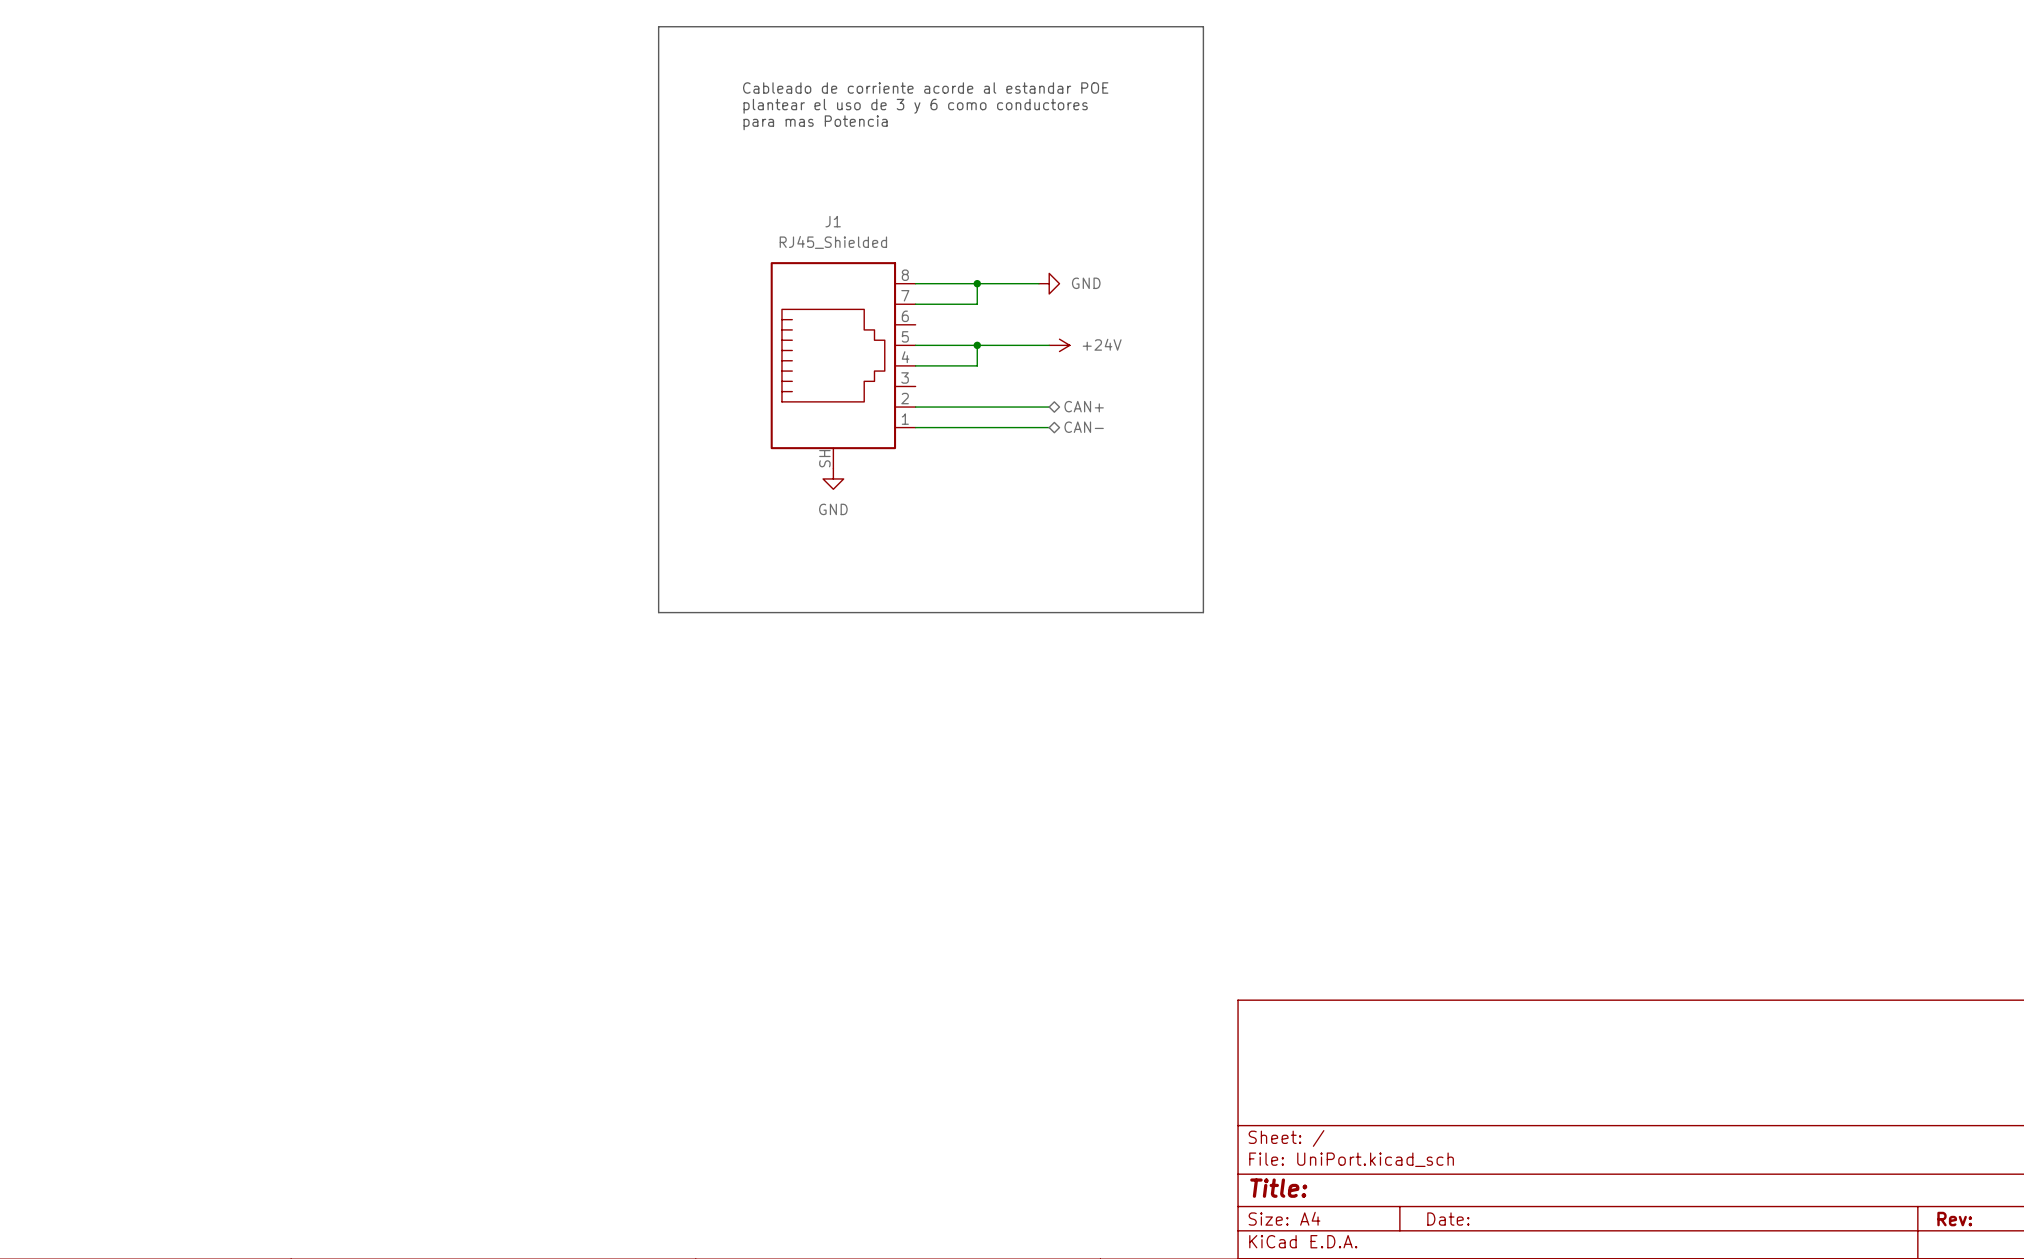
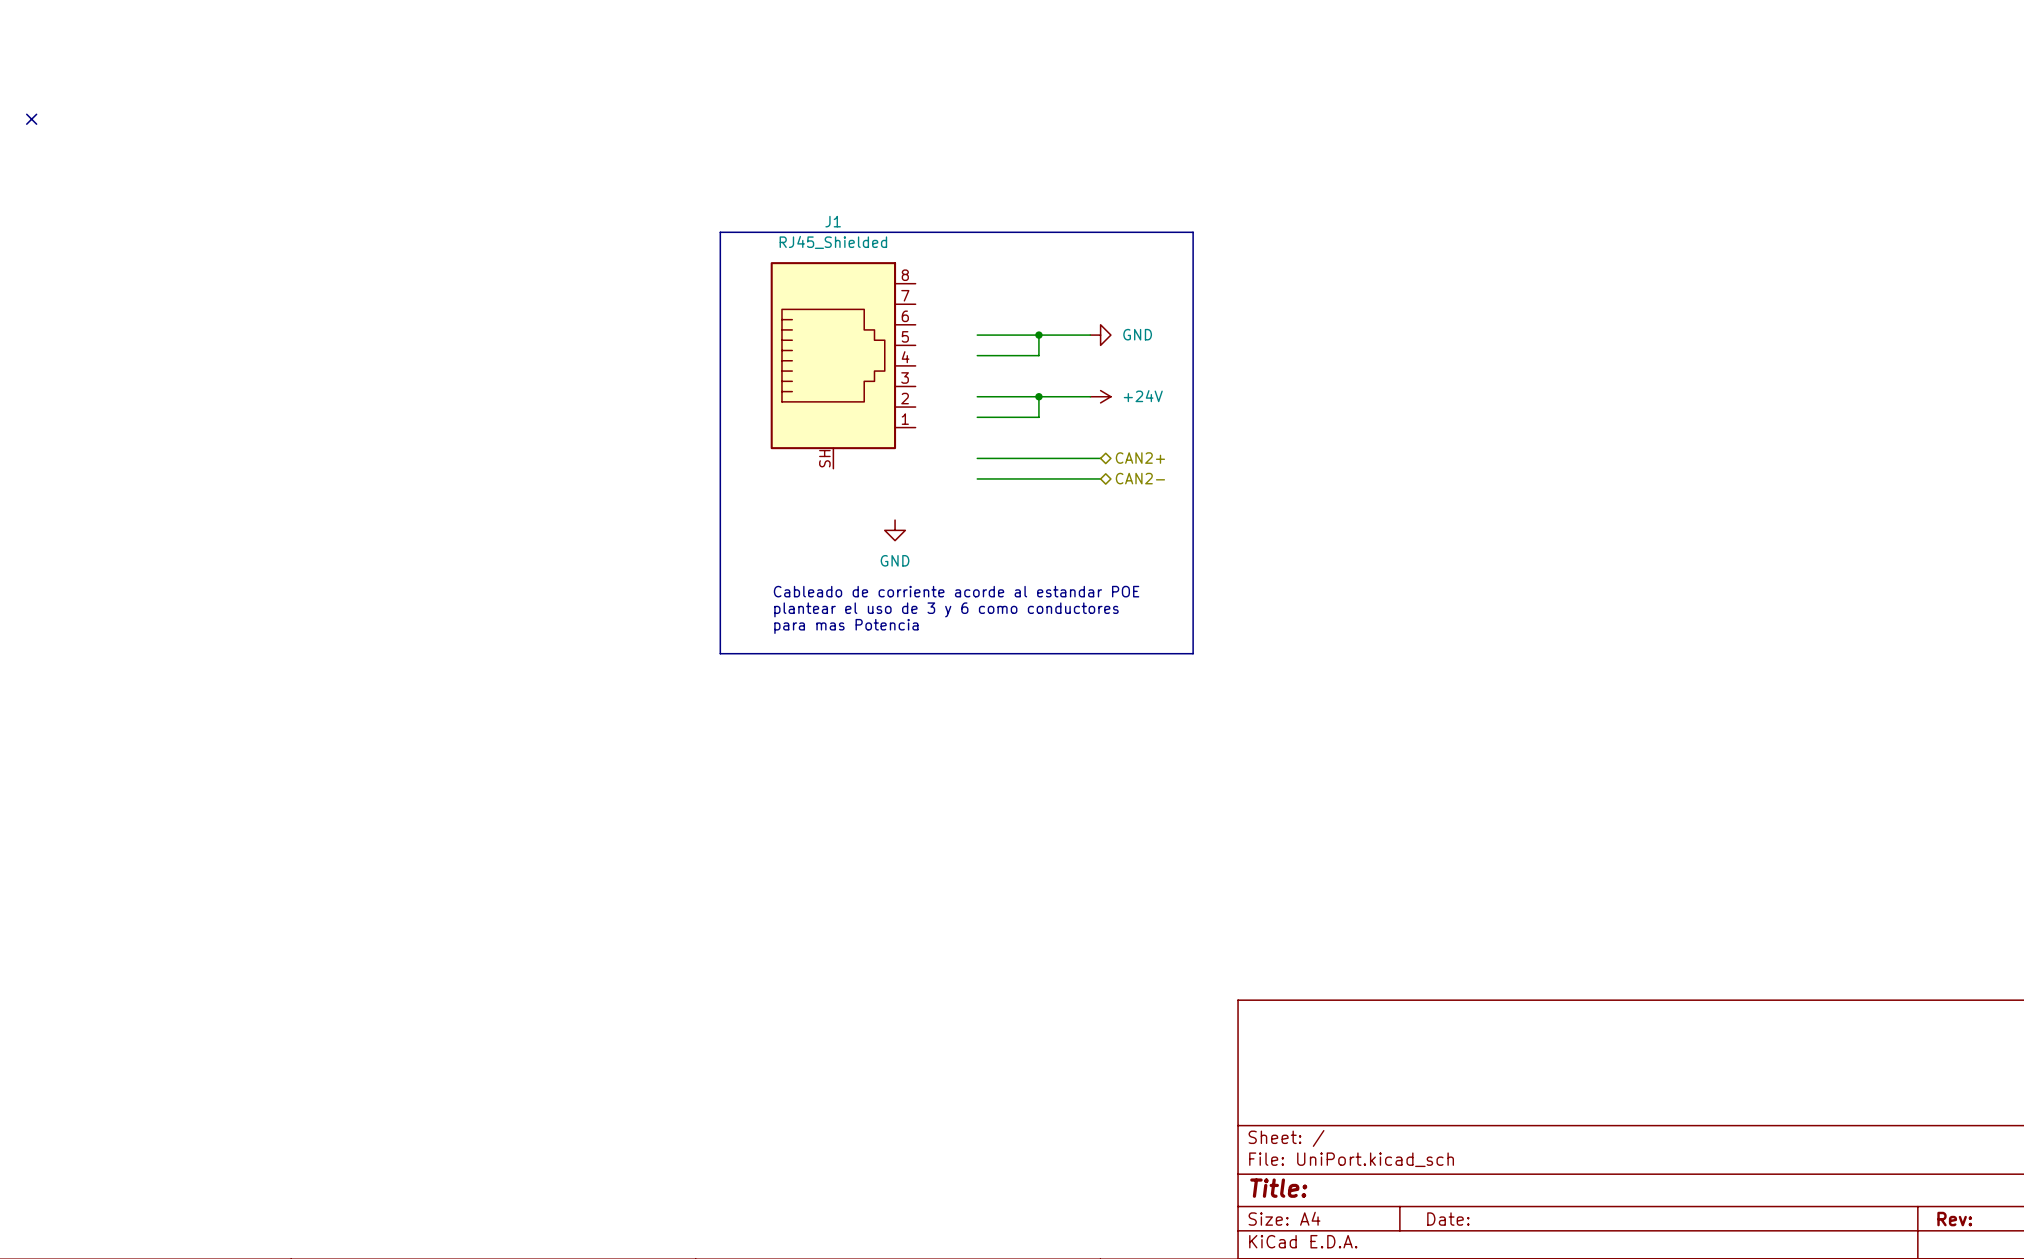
line: (658, 26) (1203, 26) (1203, 612) (658, 612) (658, 26) -> (720, 232) (720, 653) (1193, 653) (1193, 232) (720, 232)
text: Cableado de corriente acorde al estandar POE (925, 88) -> none
text: plantear el uso de 3 y 6 como conductores (915, 106) -> none
no-connect mark: none -> (31, 119)
text: para mas Potencia (815, 122) -> none
wire: (915, 283) (1038, 283) -> (977, 458) (1100, 458)
wire: (977, 283) (977, 304) (915, 304) -> (1038, 335) (1038, 355) (977, 355)
junction: (977, 283) -> none
power symbol position: GND (1049, 283) -> GND (1100, 335)
wire: none -> (977, 335) (1090, 335)
junction: none -> (1038, 335)
wire: (915, 345) (1049, 345) -> none
wire: (977, 345) (977, 365) (915, 365) -> (1038, 396) (1038, 417) (977, 417)
junction: (977, 345) -> none
power symbol position: +24V (1059, 345) -> +24V (1100, 396)
wire: none -> (977, 396) (1090, 396)
junction: none -> (1038, 396)
hierarchical label: CAN+ (1084, 406) -> none
wire: (915, 407) (1049, 407) -> none
wire: (915, 427) (1049, 427) -> none
hierarchical label: CAN- (1084, 427) -> none
hierarchical label: none -> CAN2+ (1140, 458)
power symbol position: GND (833, 478) -> GND (895, 530)
wire: none -> (977, 478) (1100, 478)
hierarchical label: none -> CAN2- (1140, 478)
text: none -> Cableado de corriente acorde al estandar POE (956, 591)
text: none -> plantear el uso de 3 y 6 como conductores (946, 609)
text: none -> para mas Potencia (846, 626)

